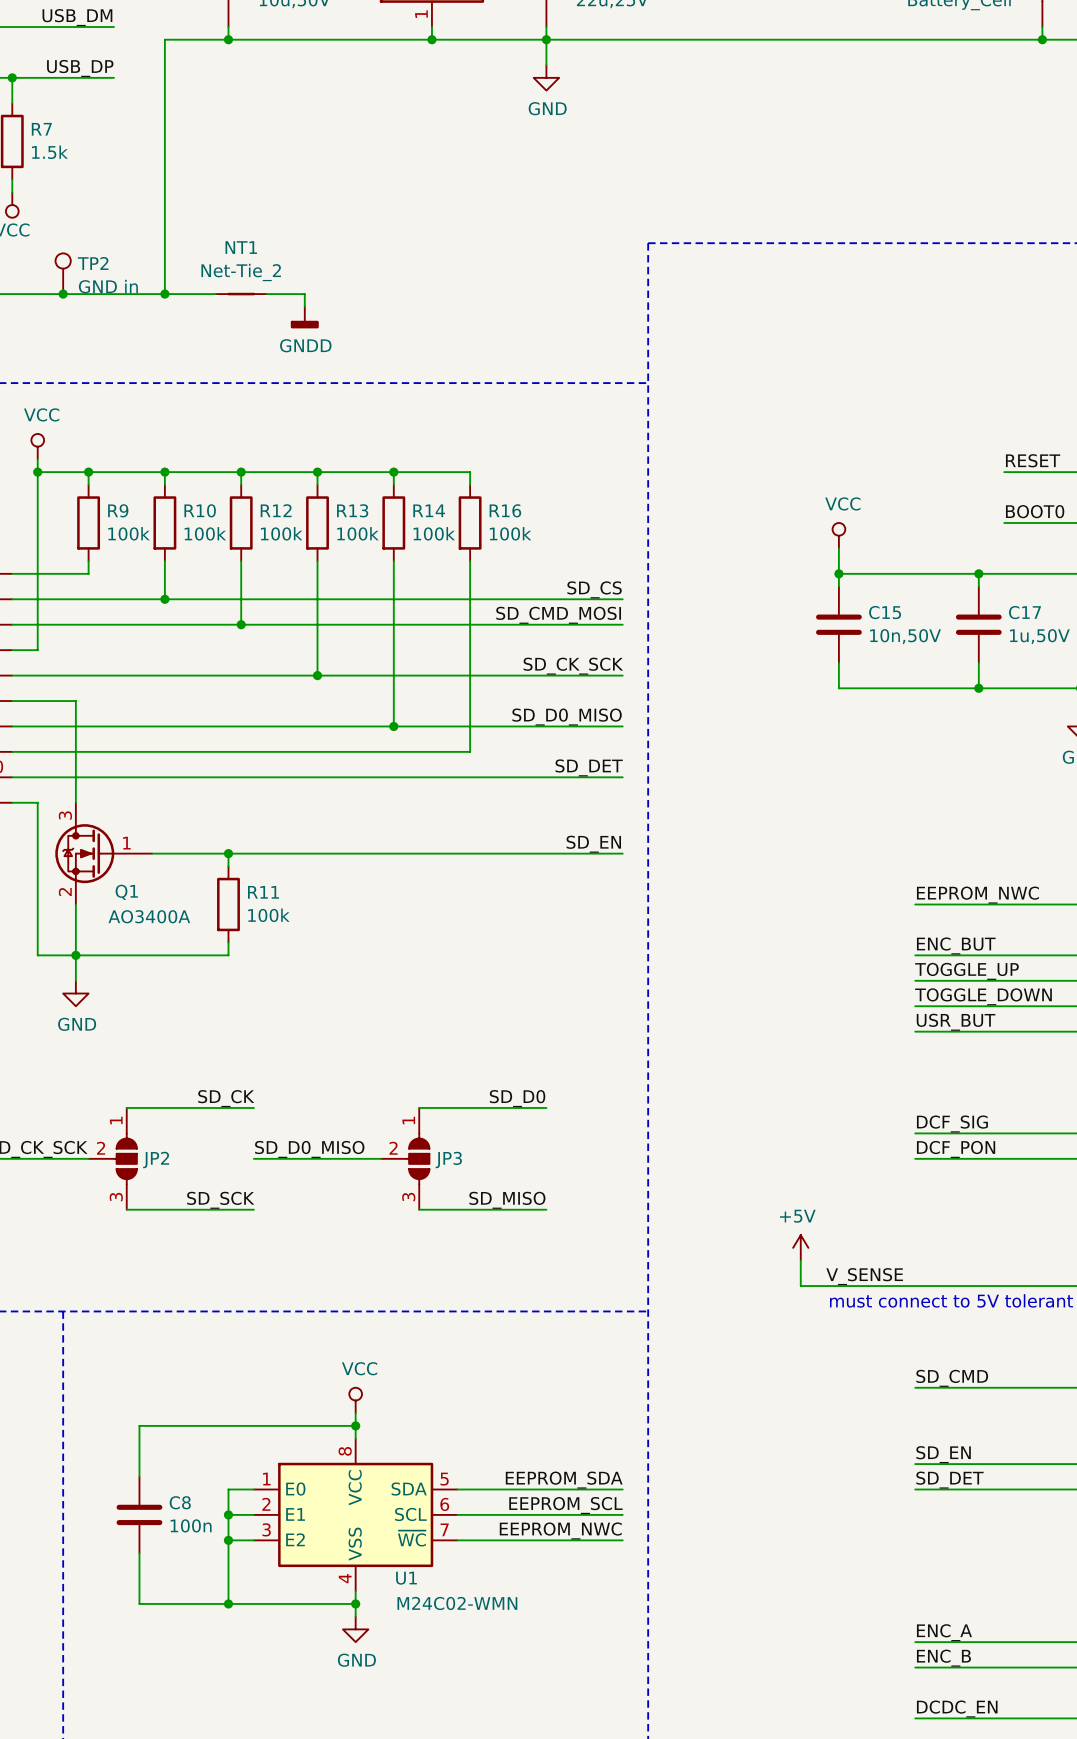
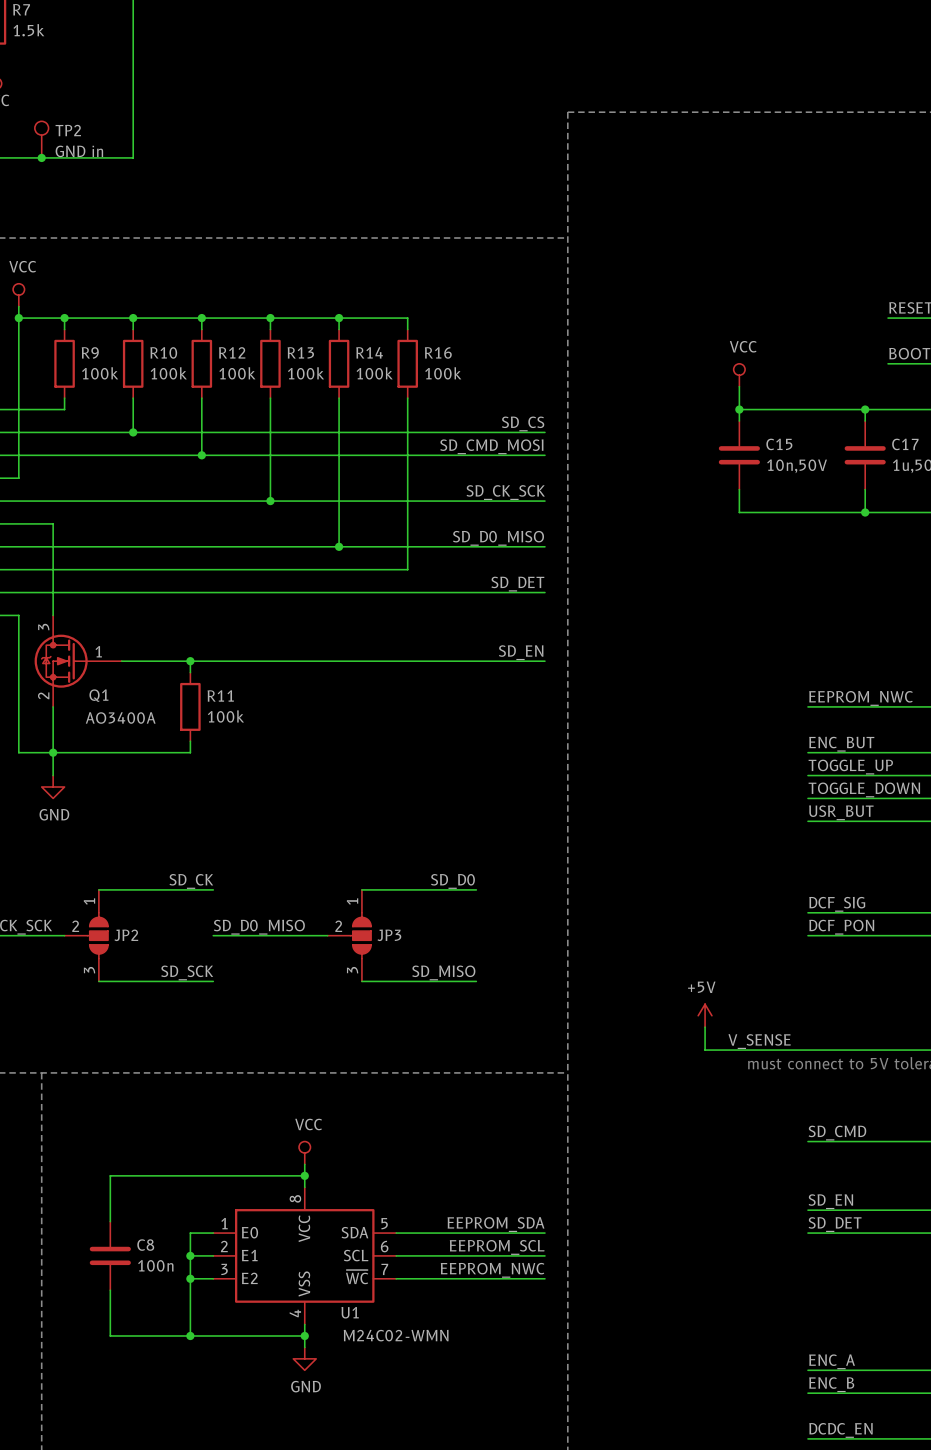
wire: (164, 294) (215, 294) -> none
junction: (164, 294) -> none
NT1: Net-Tie_2 (241, 294) -> none
wire: (266, 294) (304, 294) (304, 306) -> none
power symbol: GNDD (304, 317) -> none

